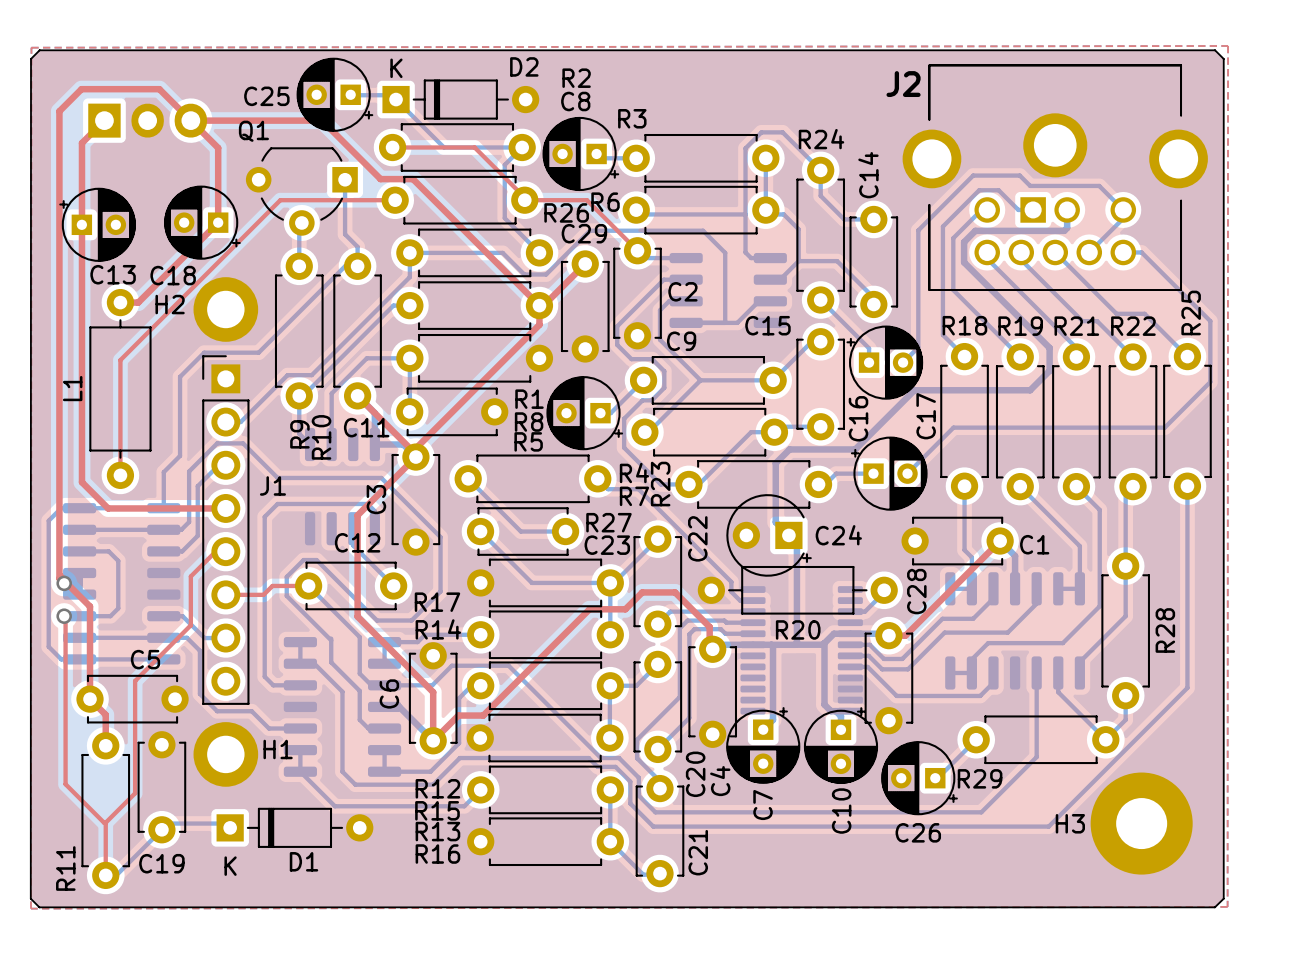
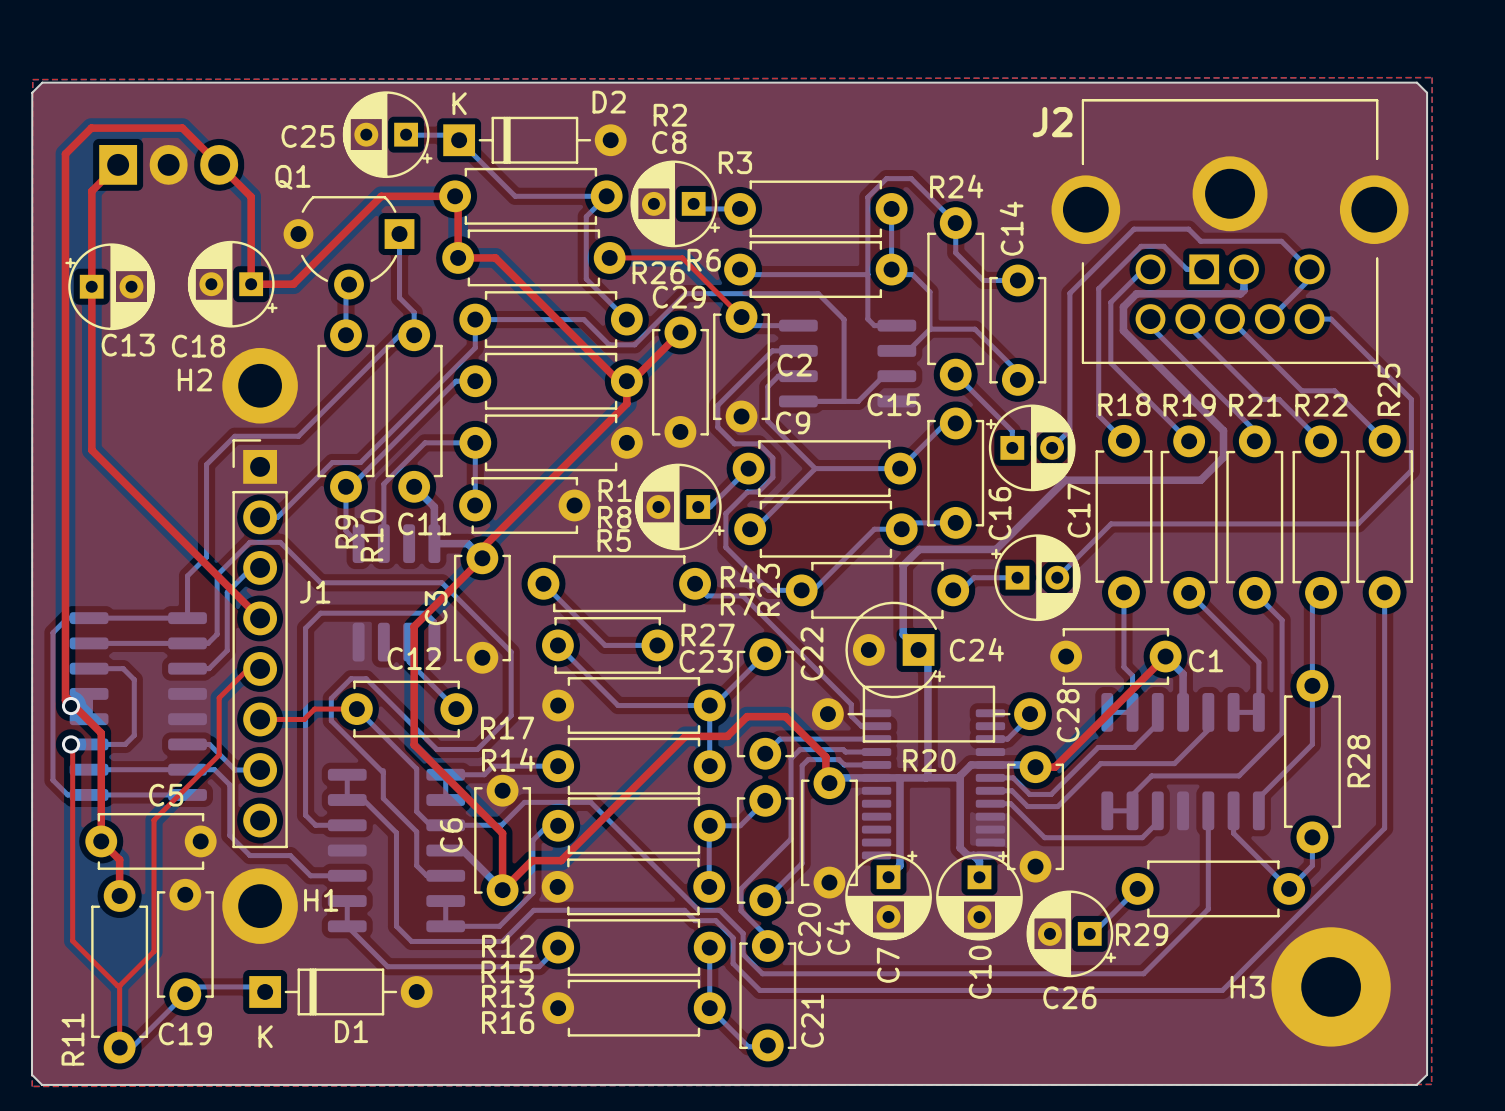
top track: (190, 120) (322, 120) (380, 179) (412, 179) (539, 305) -> (251, 284) (293, 284) (381, 196) (455, 196) (458, 199) (458, 257) (495, 257) (618, 381) (626, 381)
top track: (392, 147) (474, 147) (524, 197) (524, 200) -> none
top track: (395, 200) (280, 200) (120, 360) (120, 475) -> none
top track: (218, 222) (138, 302) (120, 302) -> none
top track: (81, 364) (81, 482) (108, 508) (225, 508) -> (91, 450) (260, 618)
L1: (120, 388) -> none
top track: (357, 395) (415, 454) -> none

